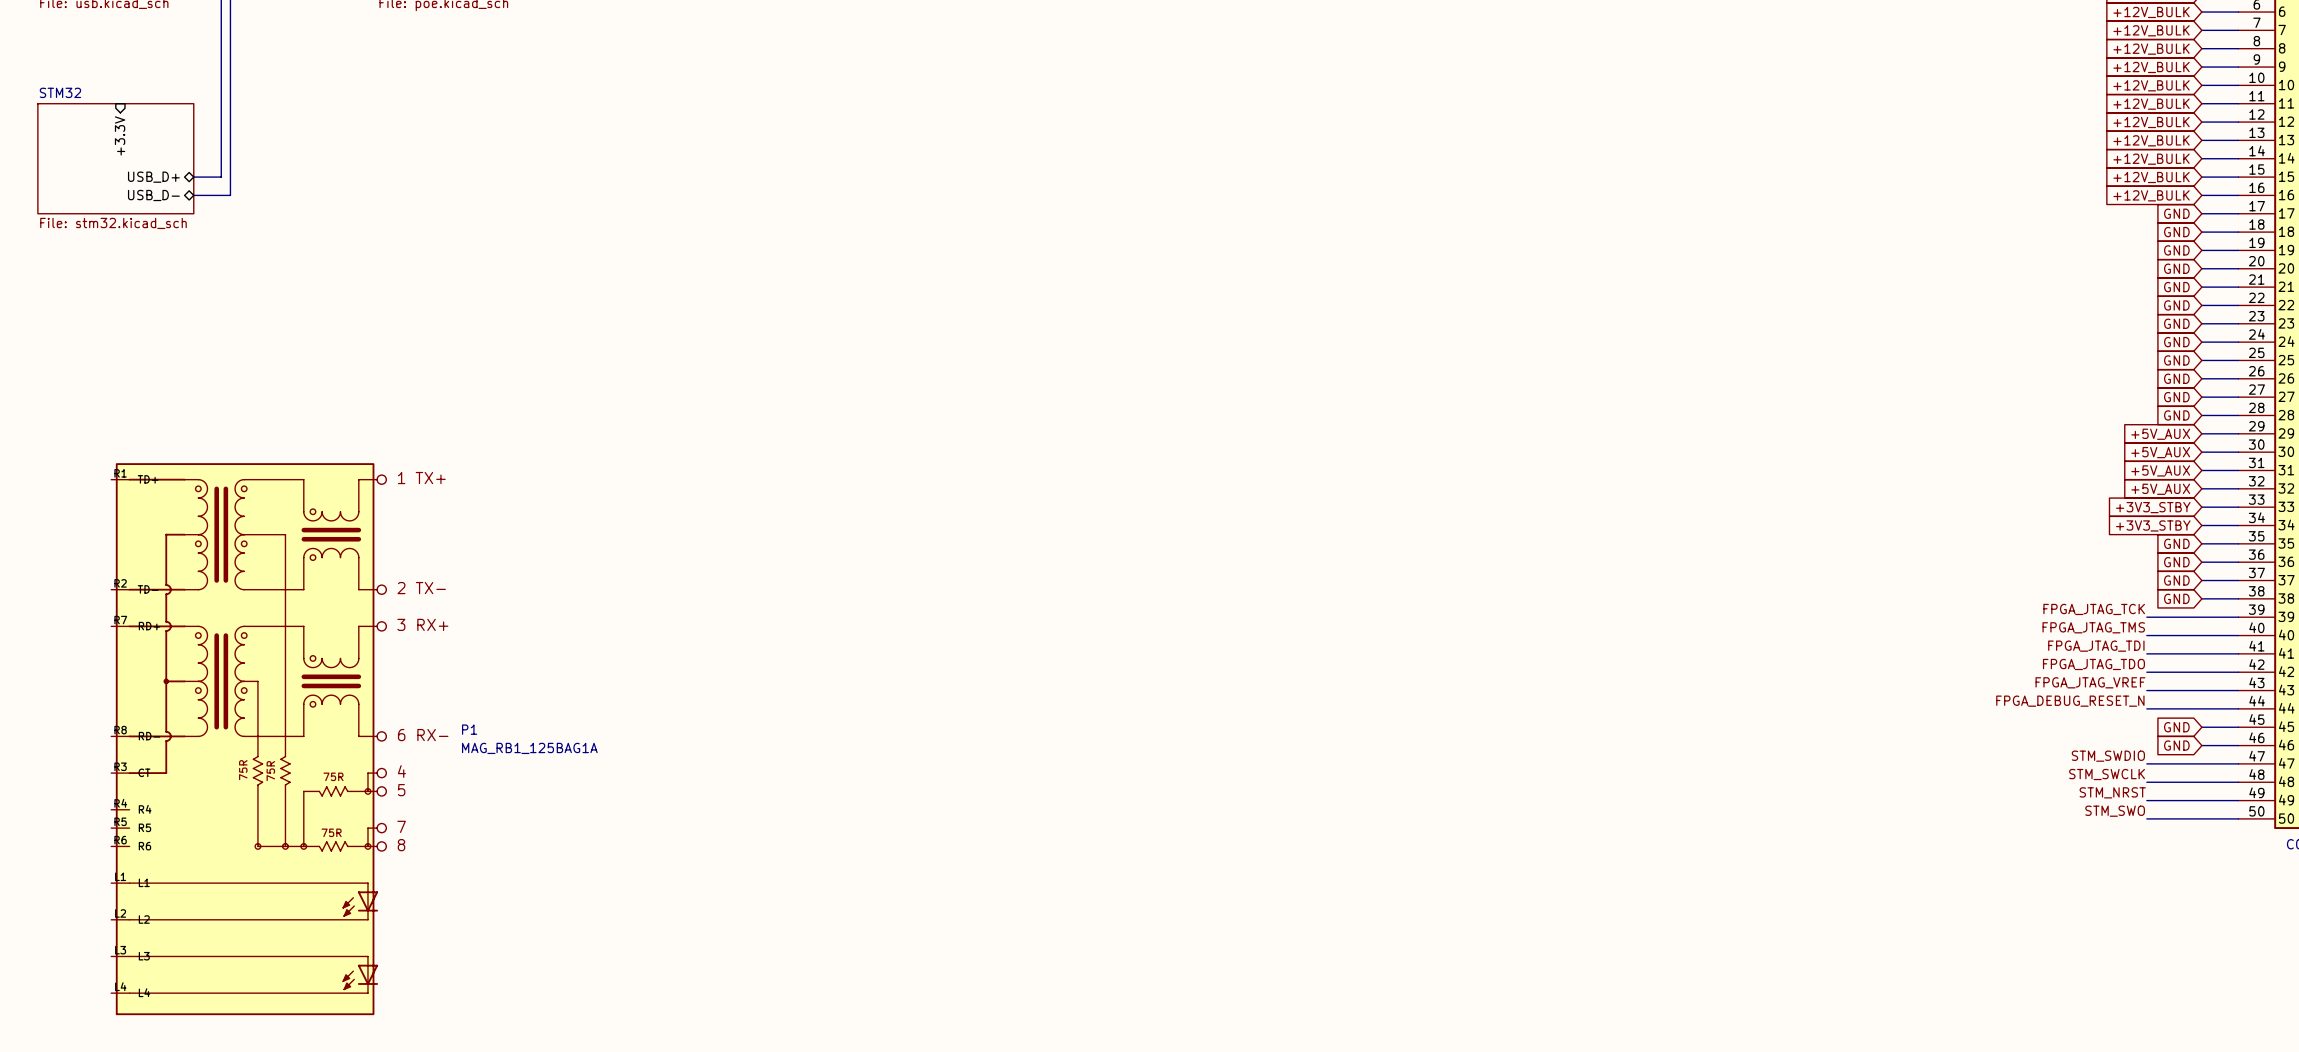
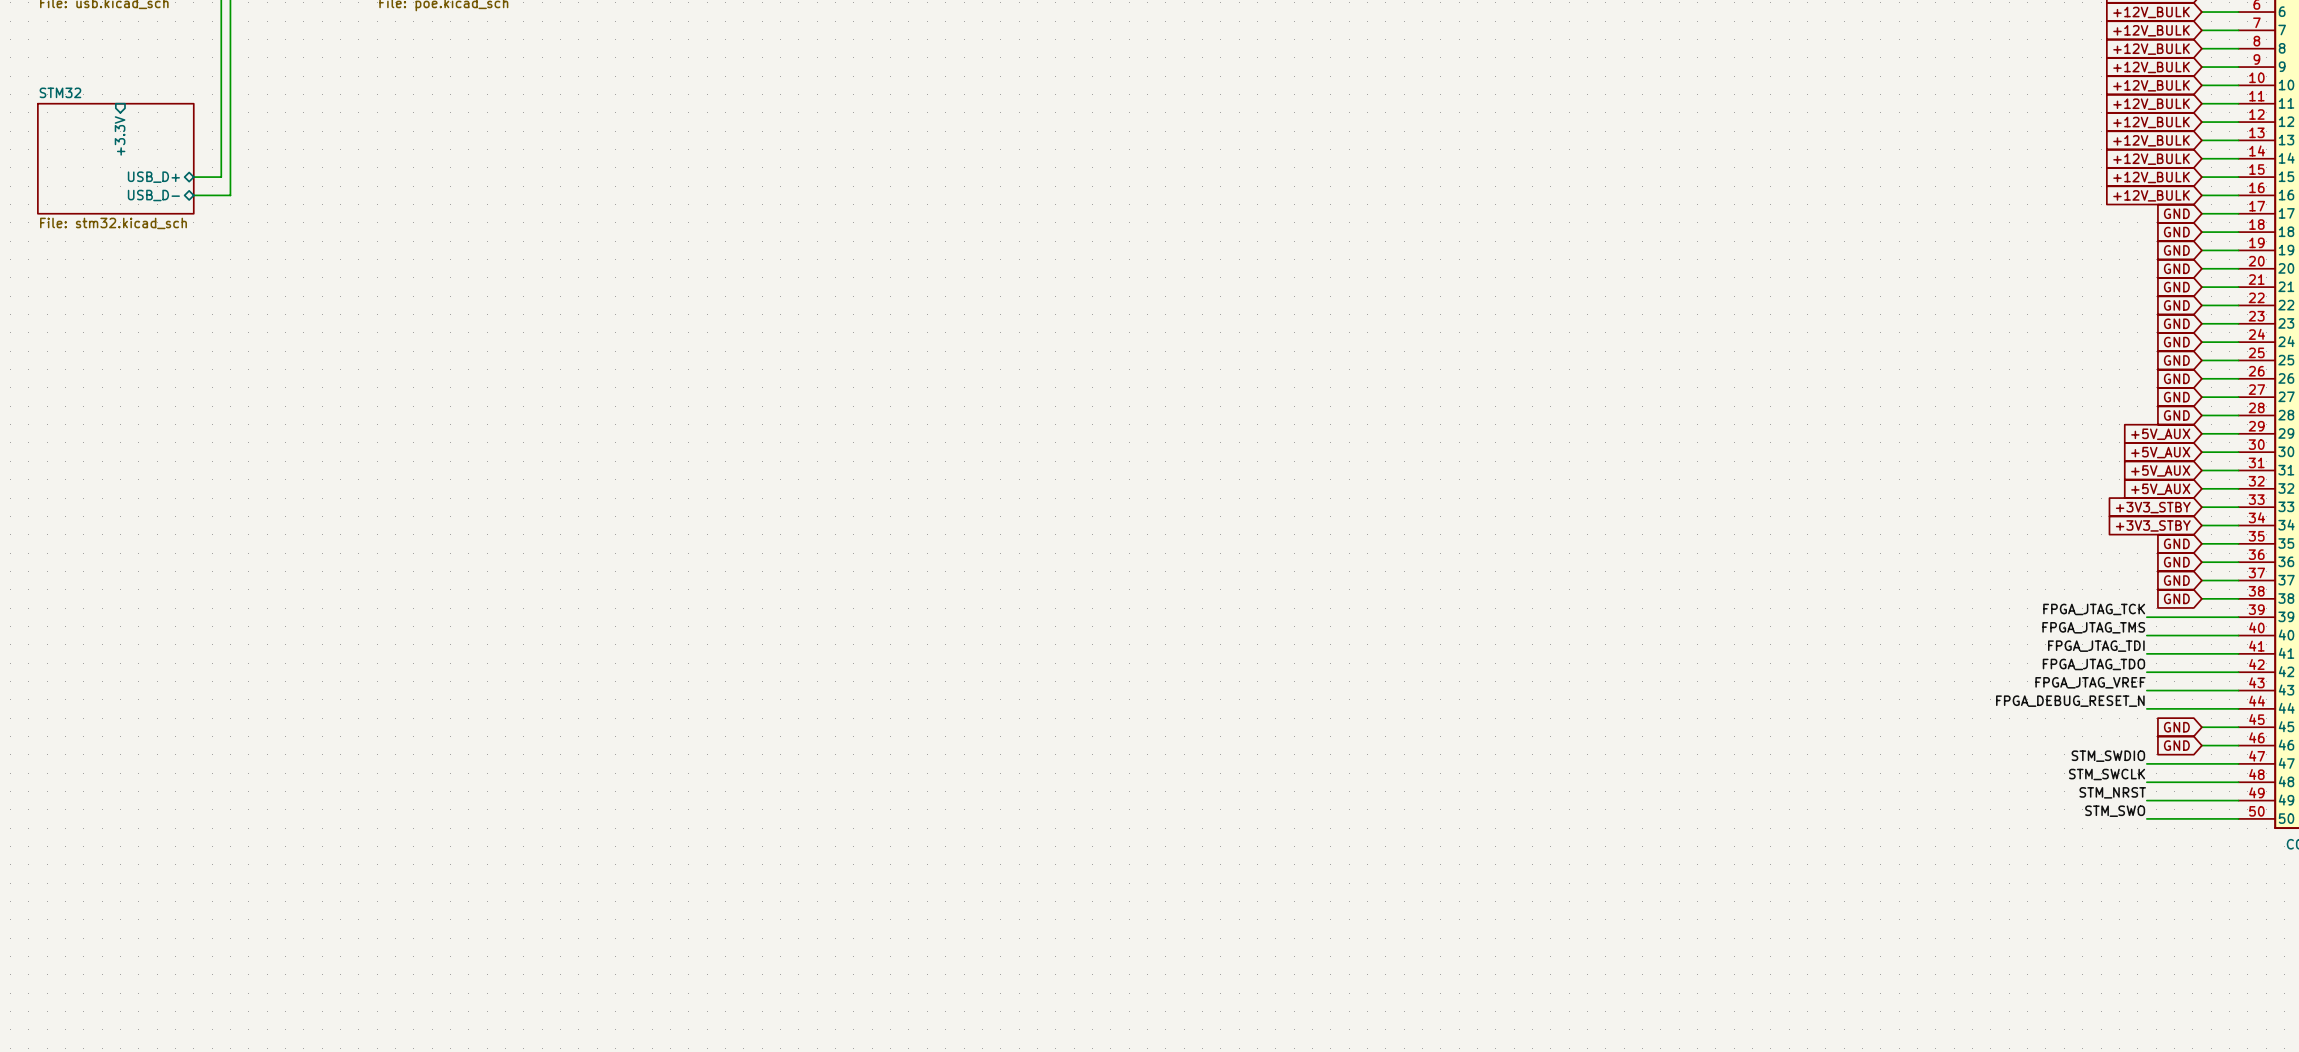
P1: MAG_RB1_125BAG1A (249, 739) -> none

